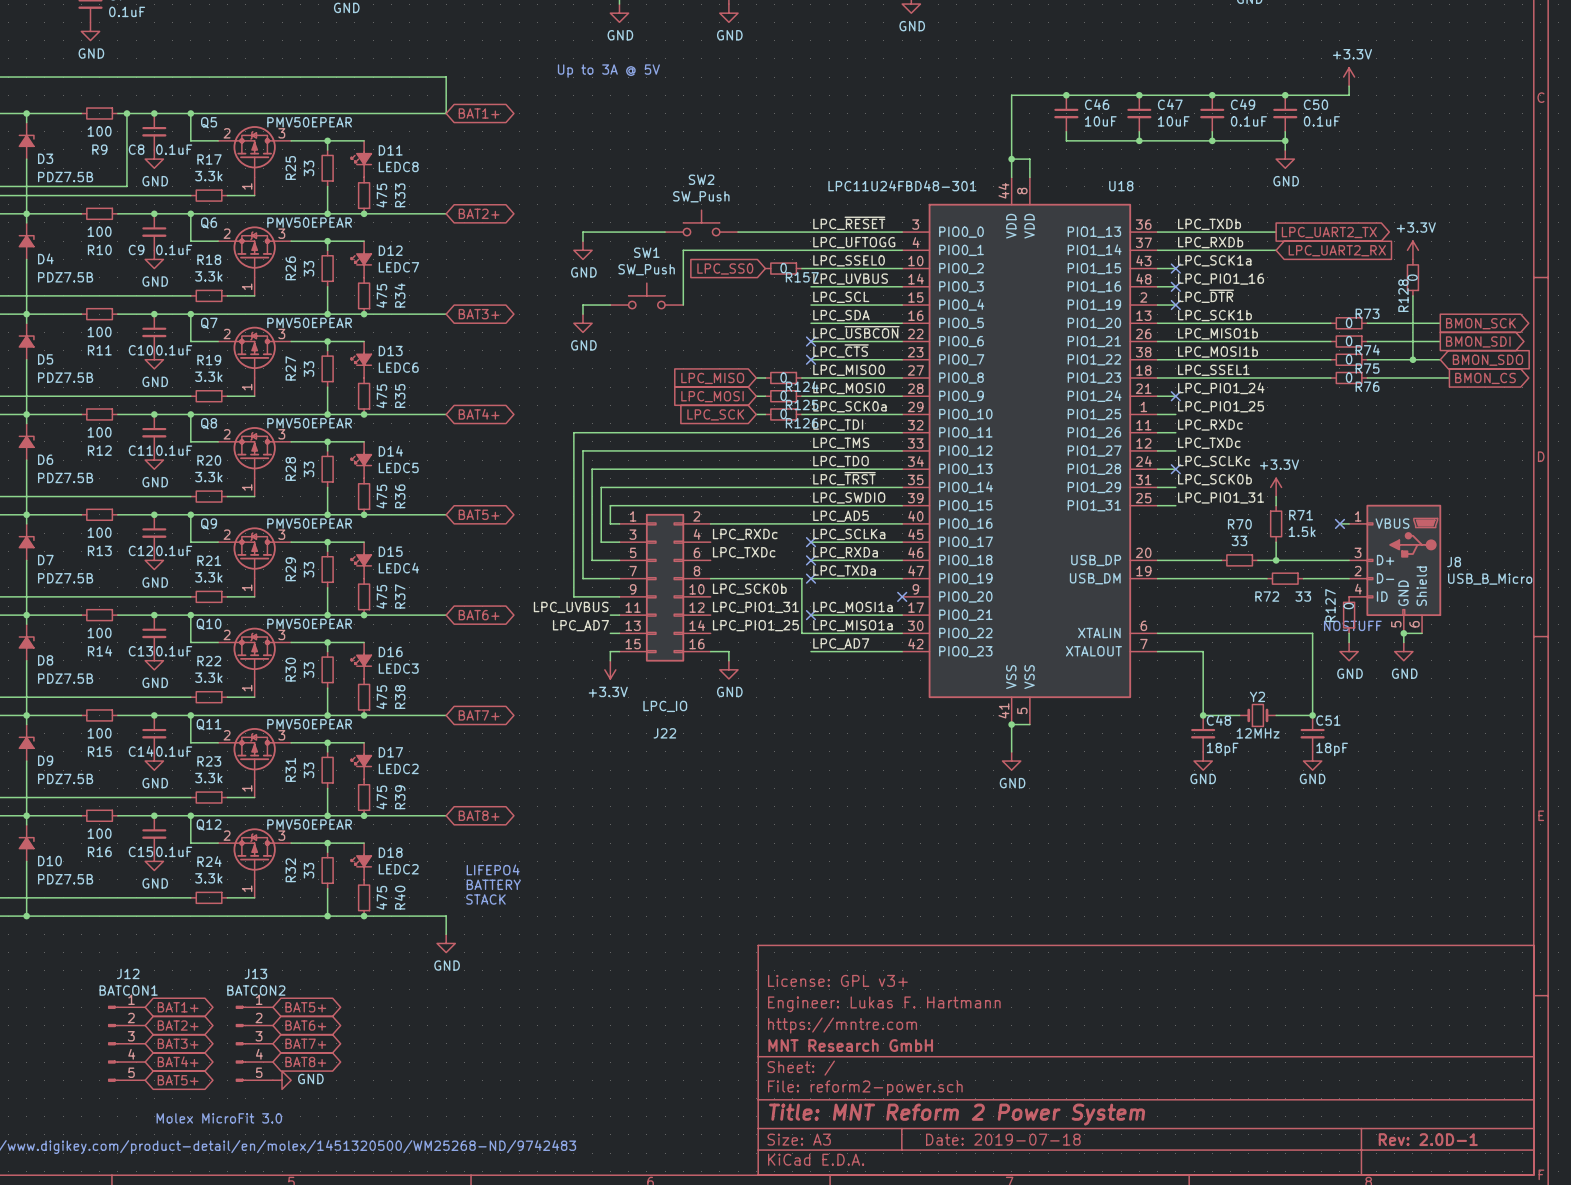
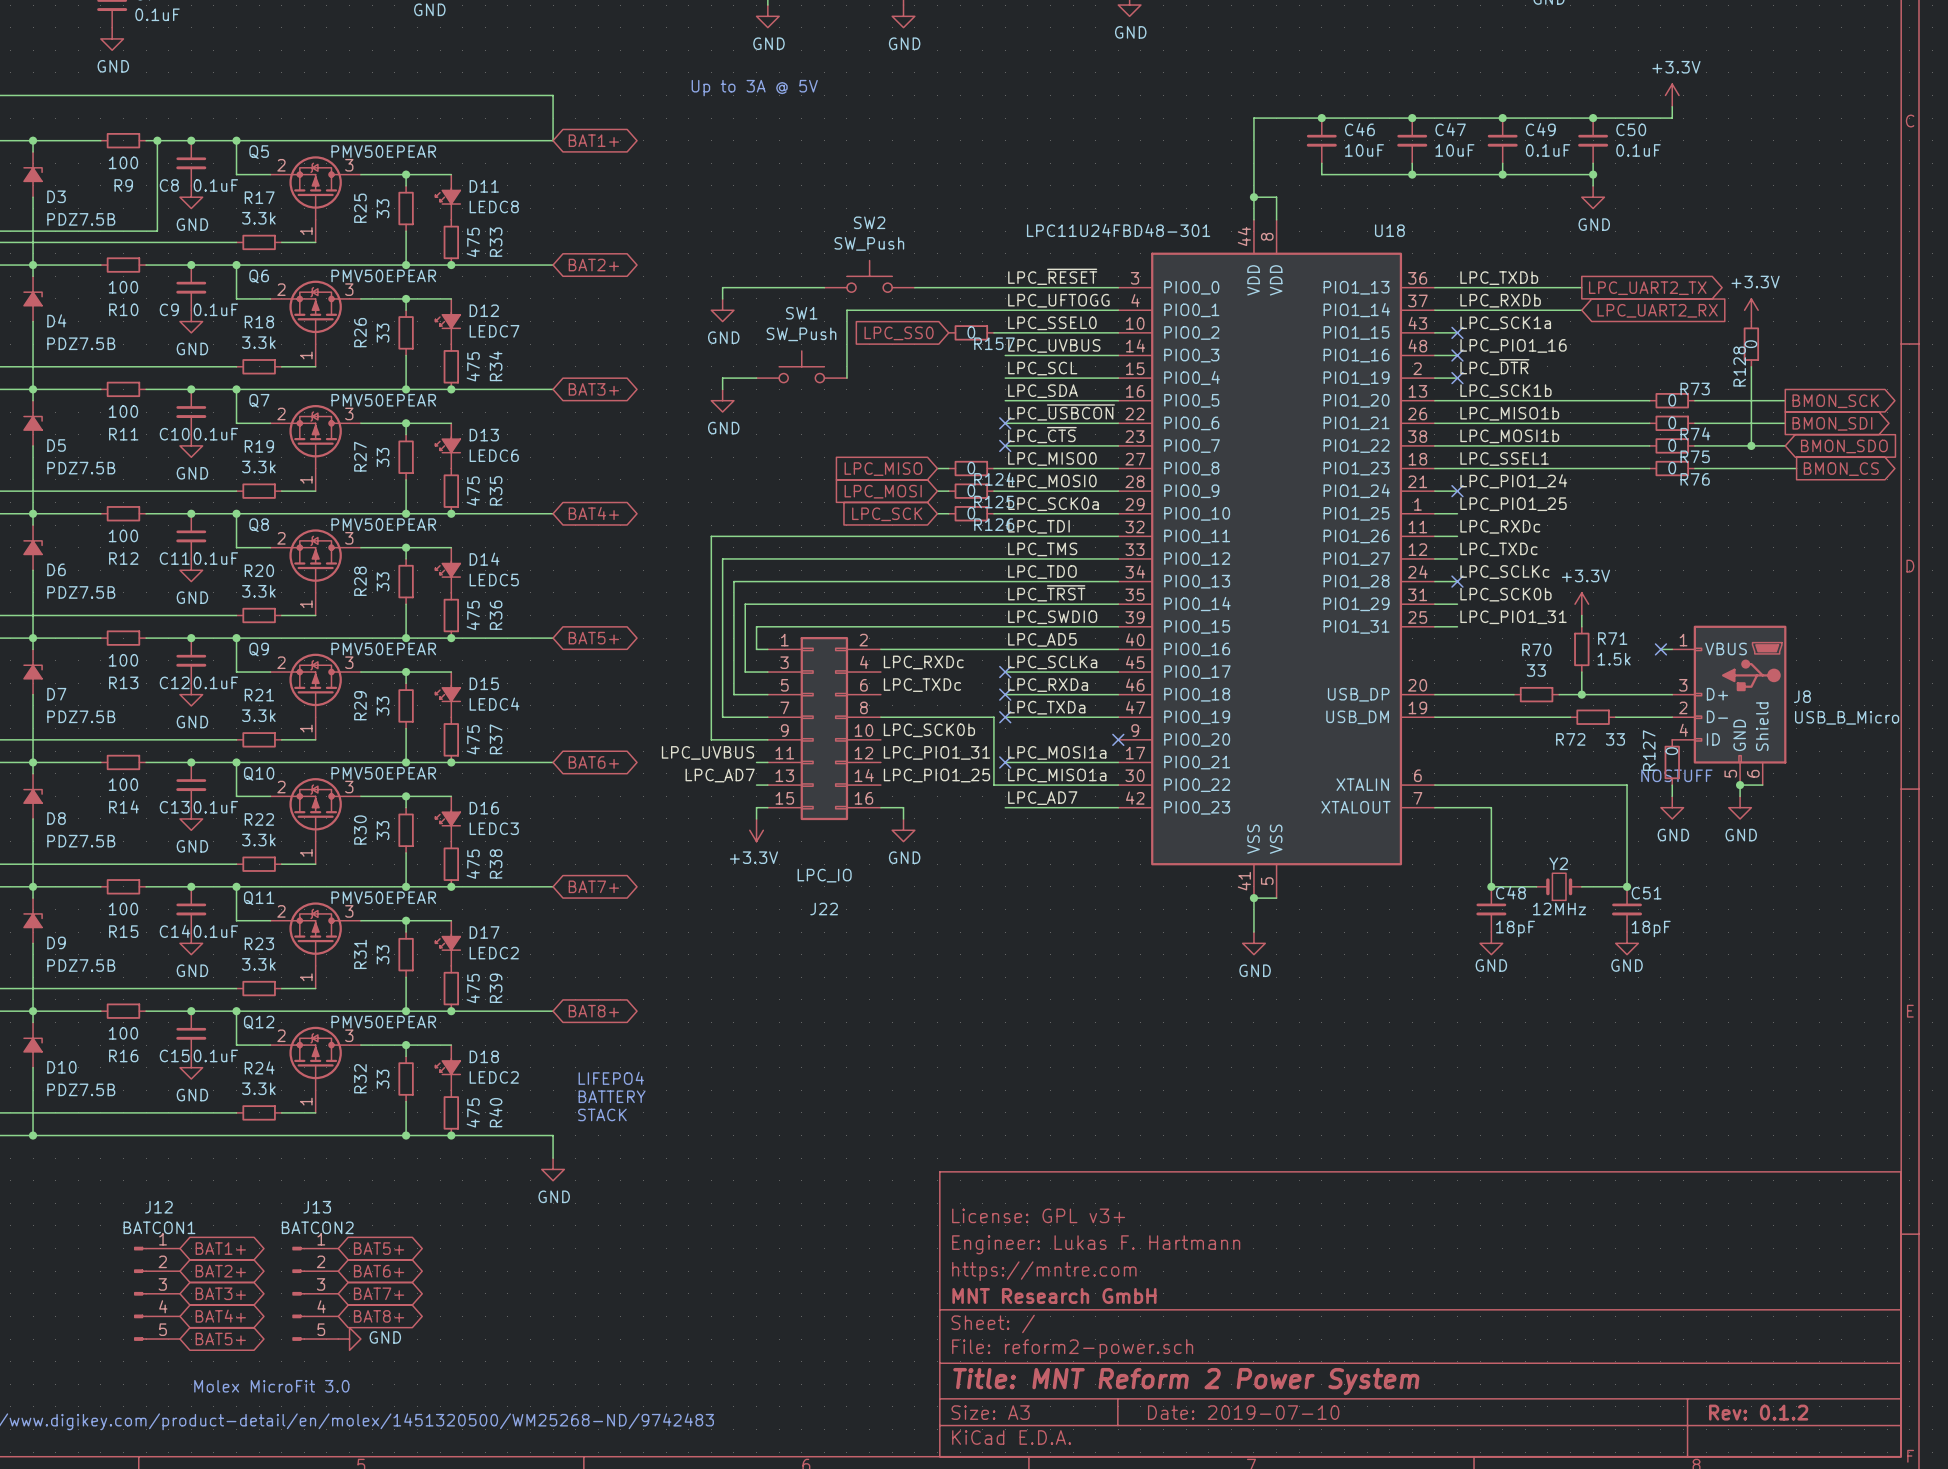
title block: Date: 2019-07-18 (1003, 1139) -> Date: 2019-07-10 (1243, 1412)
title block: Rev: 2.0D-1 (1428, 1139) -> Rev: 0.1.2 (1758, 1412)

